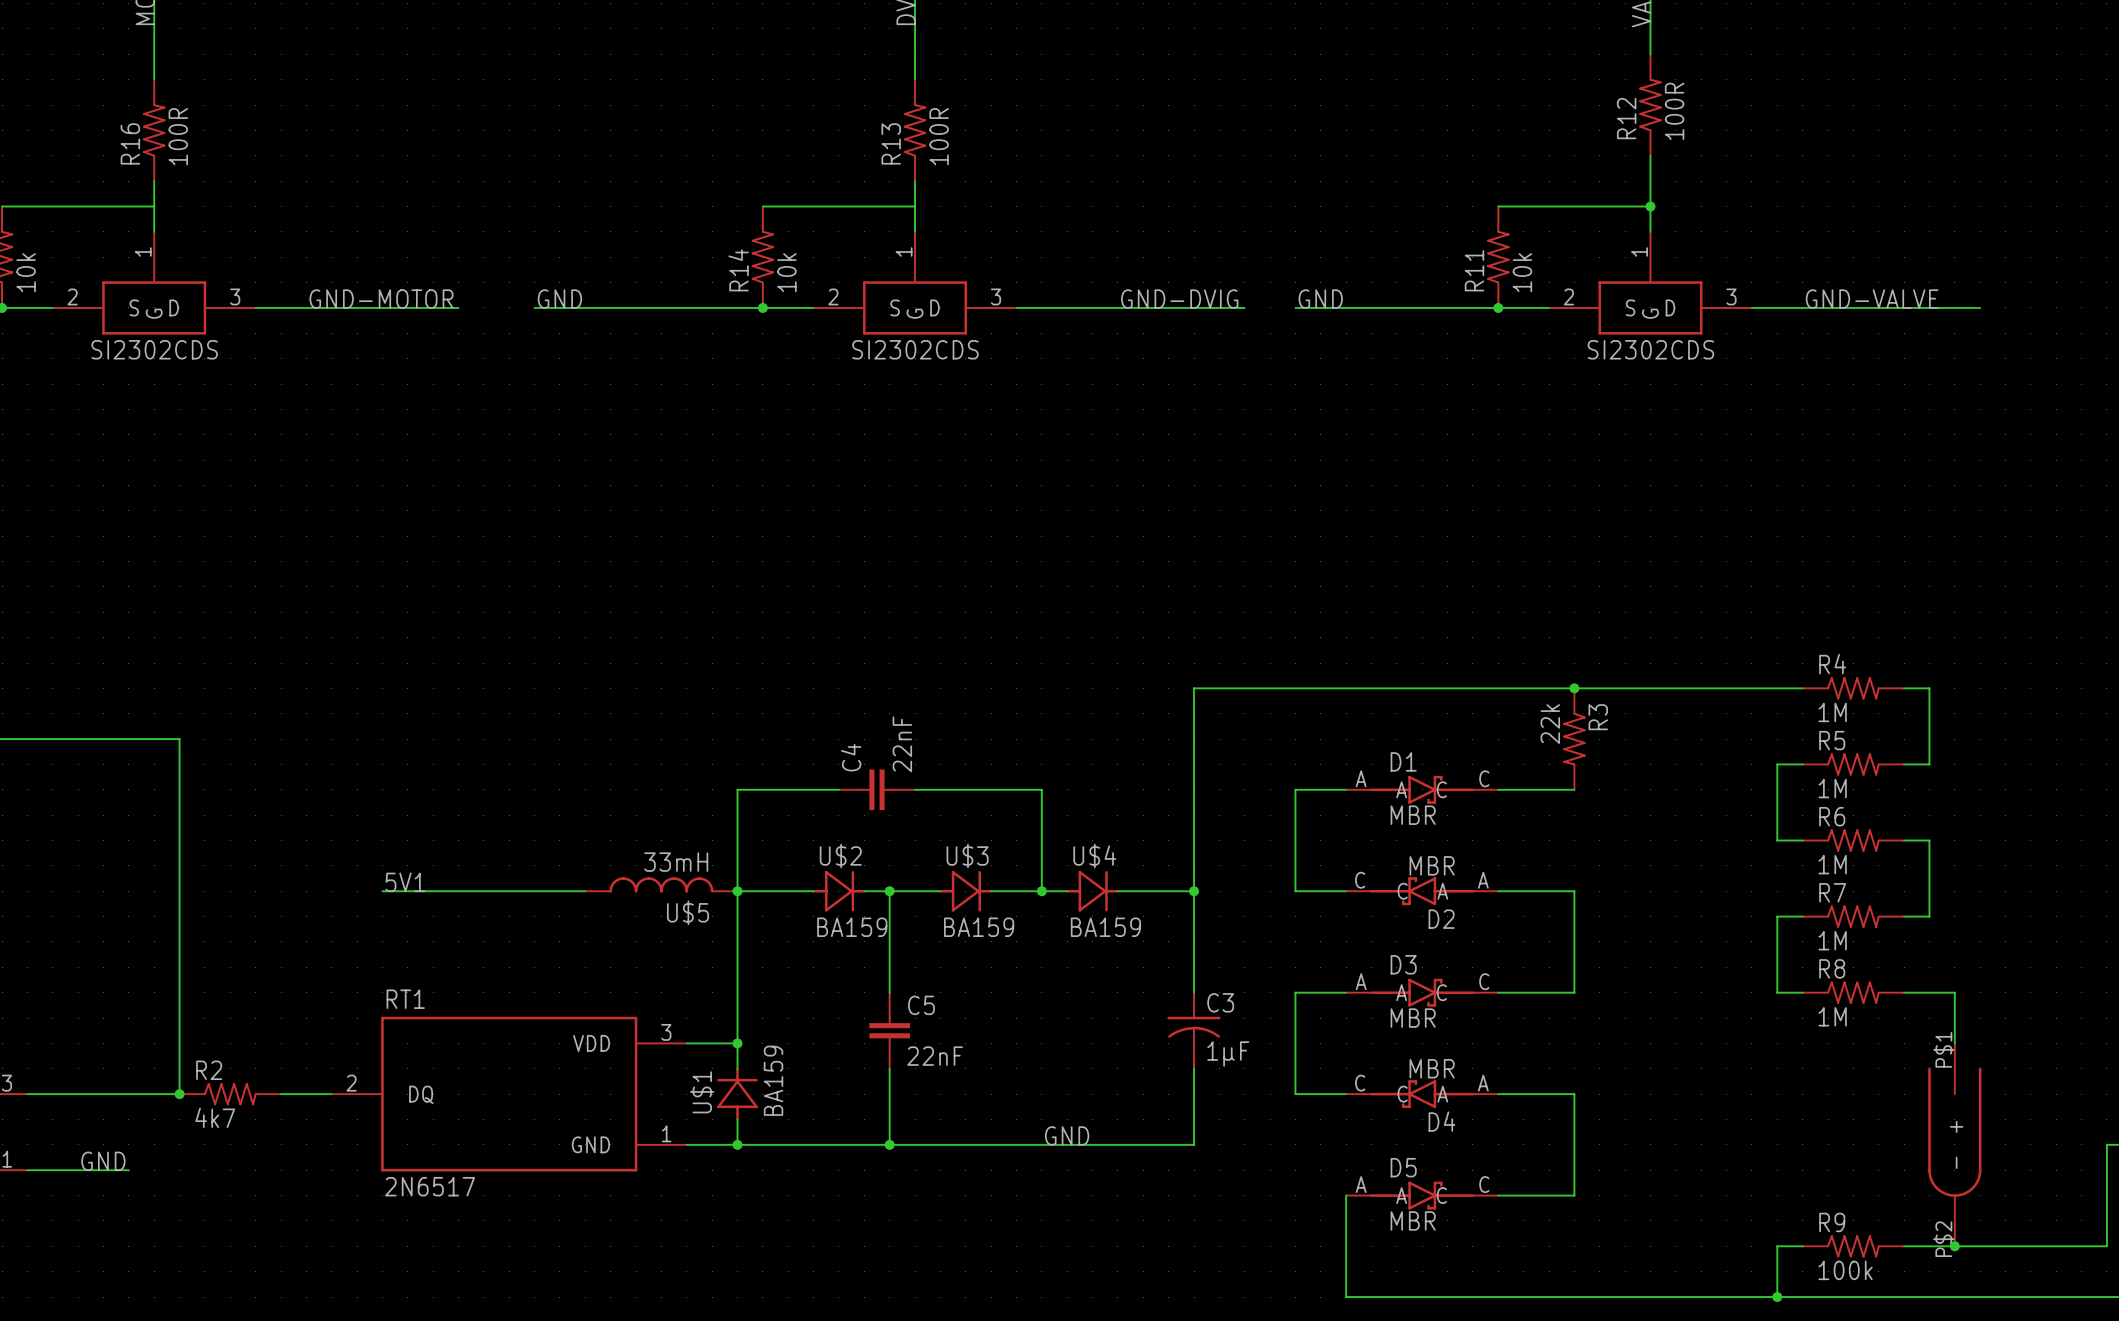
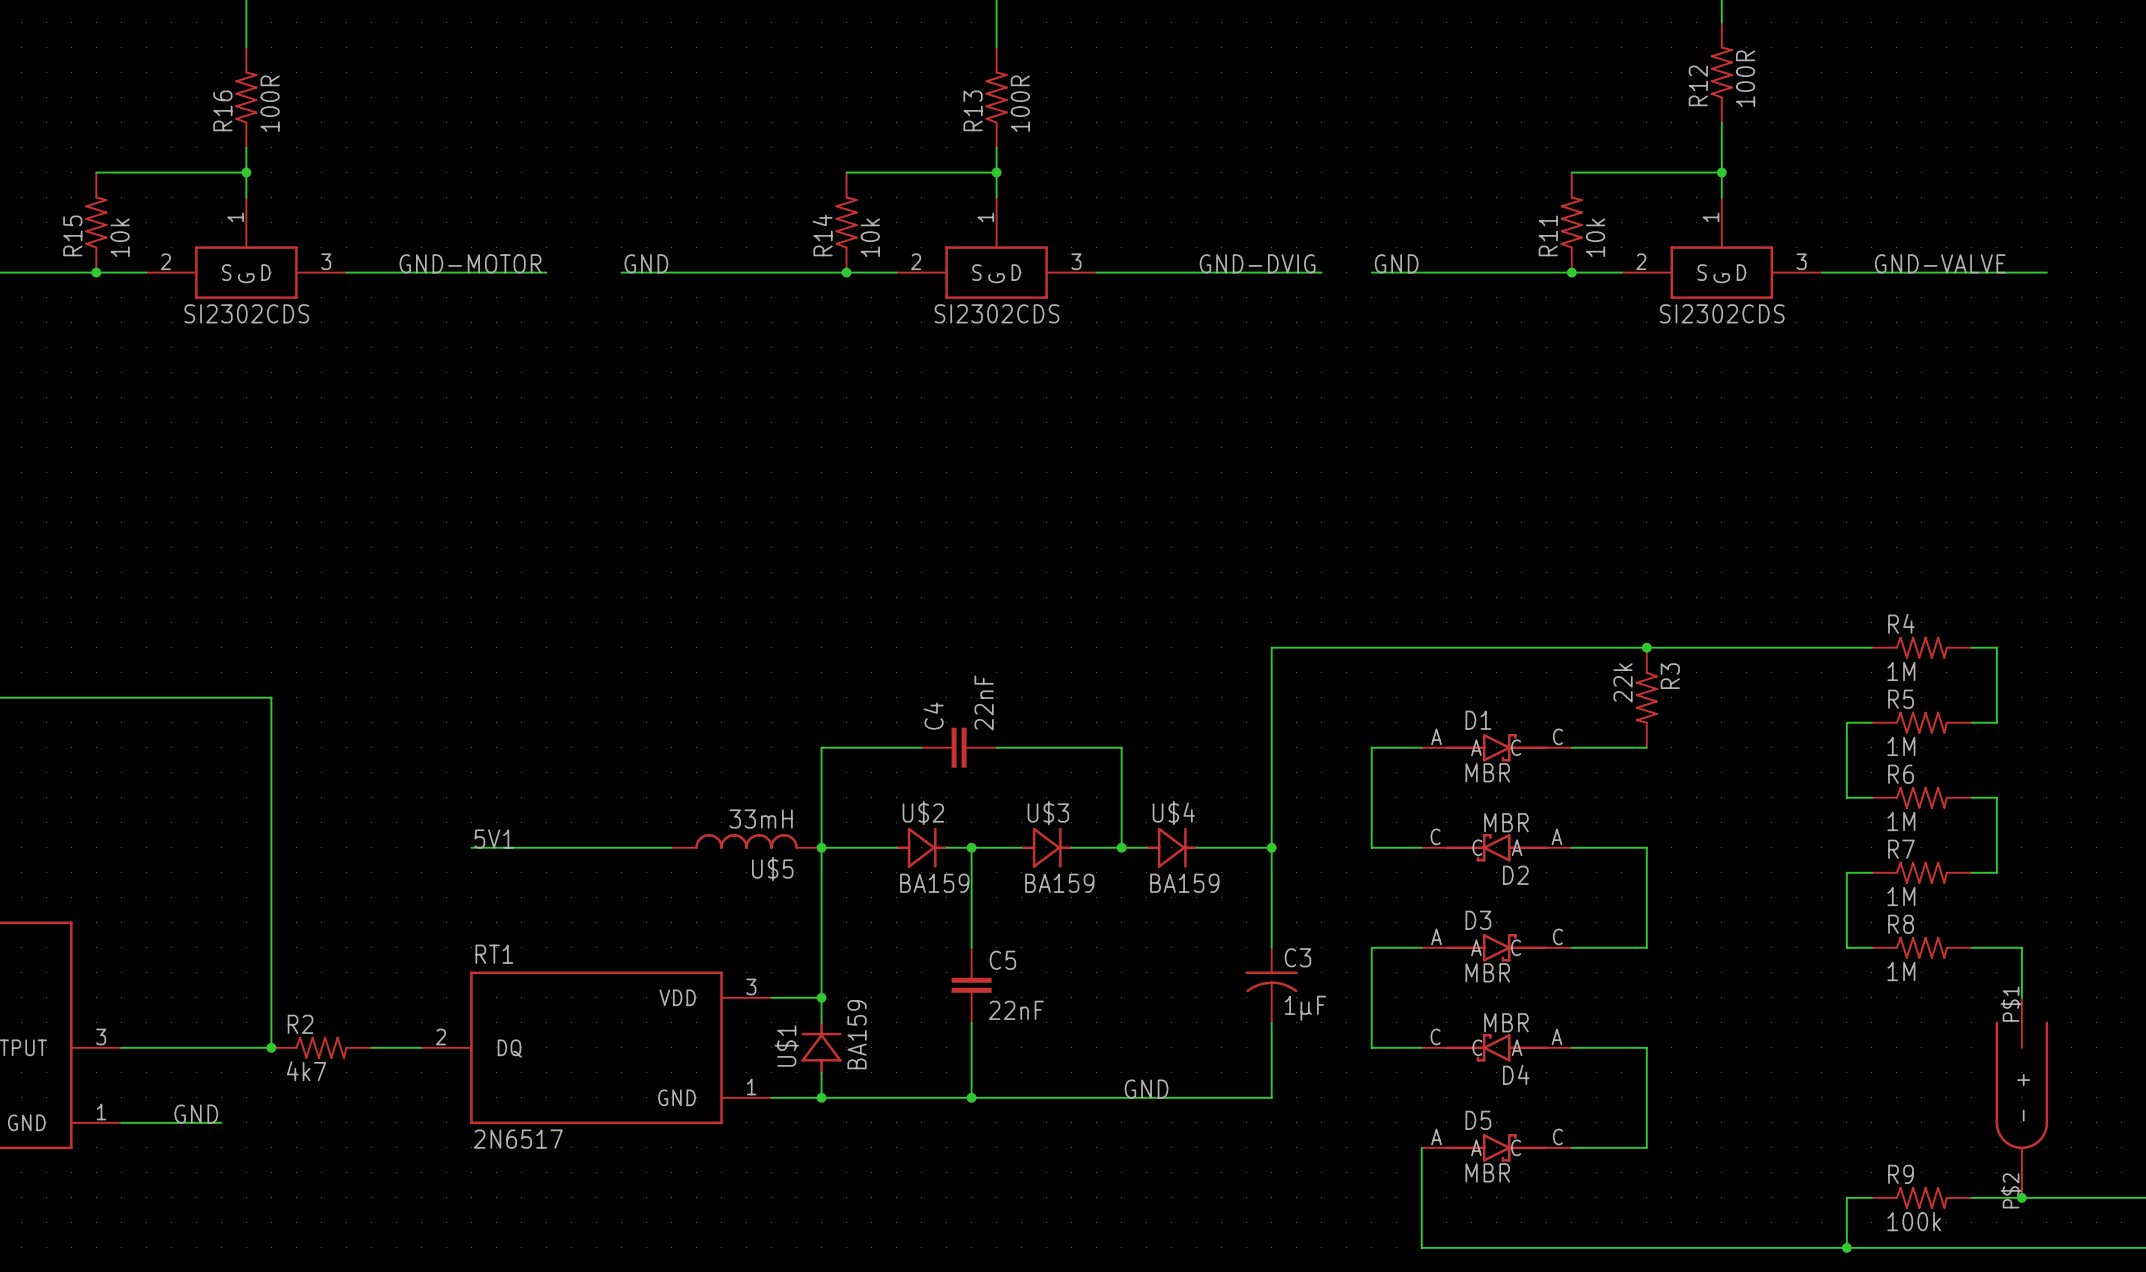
junction: none -> (246, 172)
junction: none -> (996, 172)

